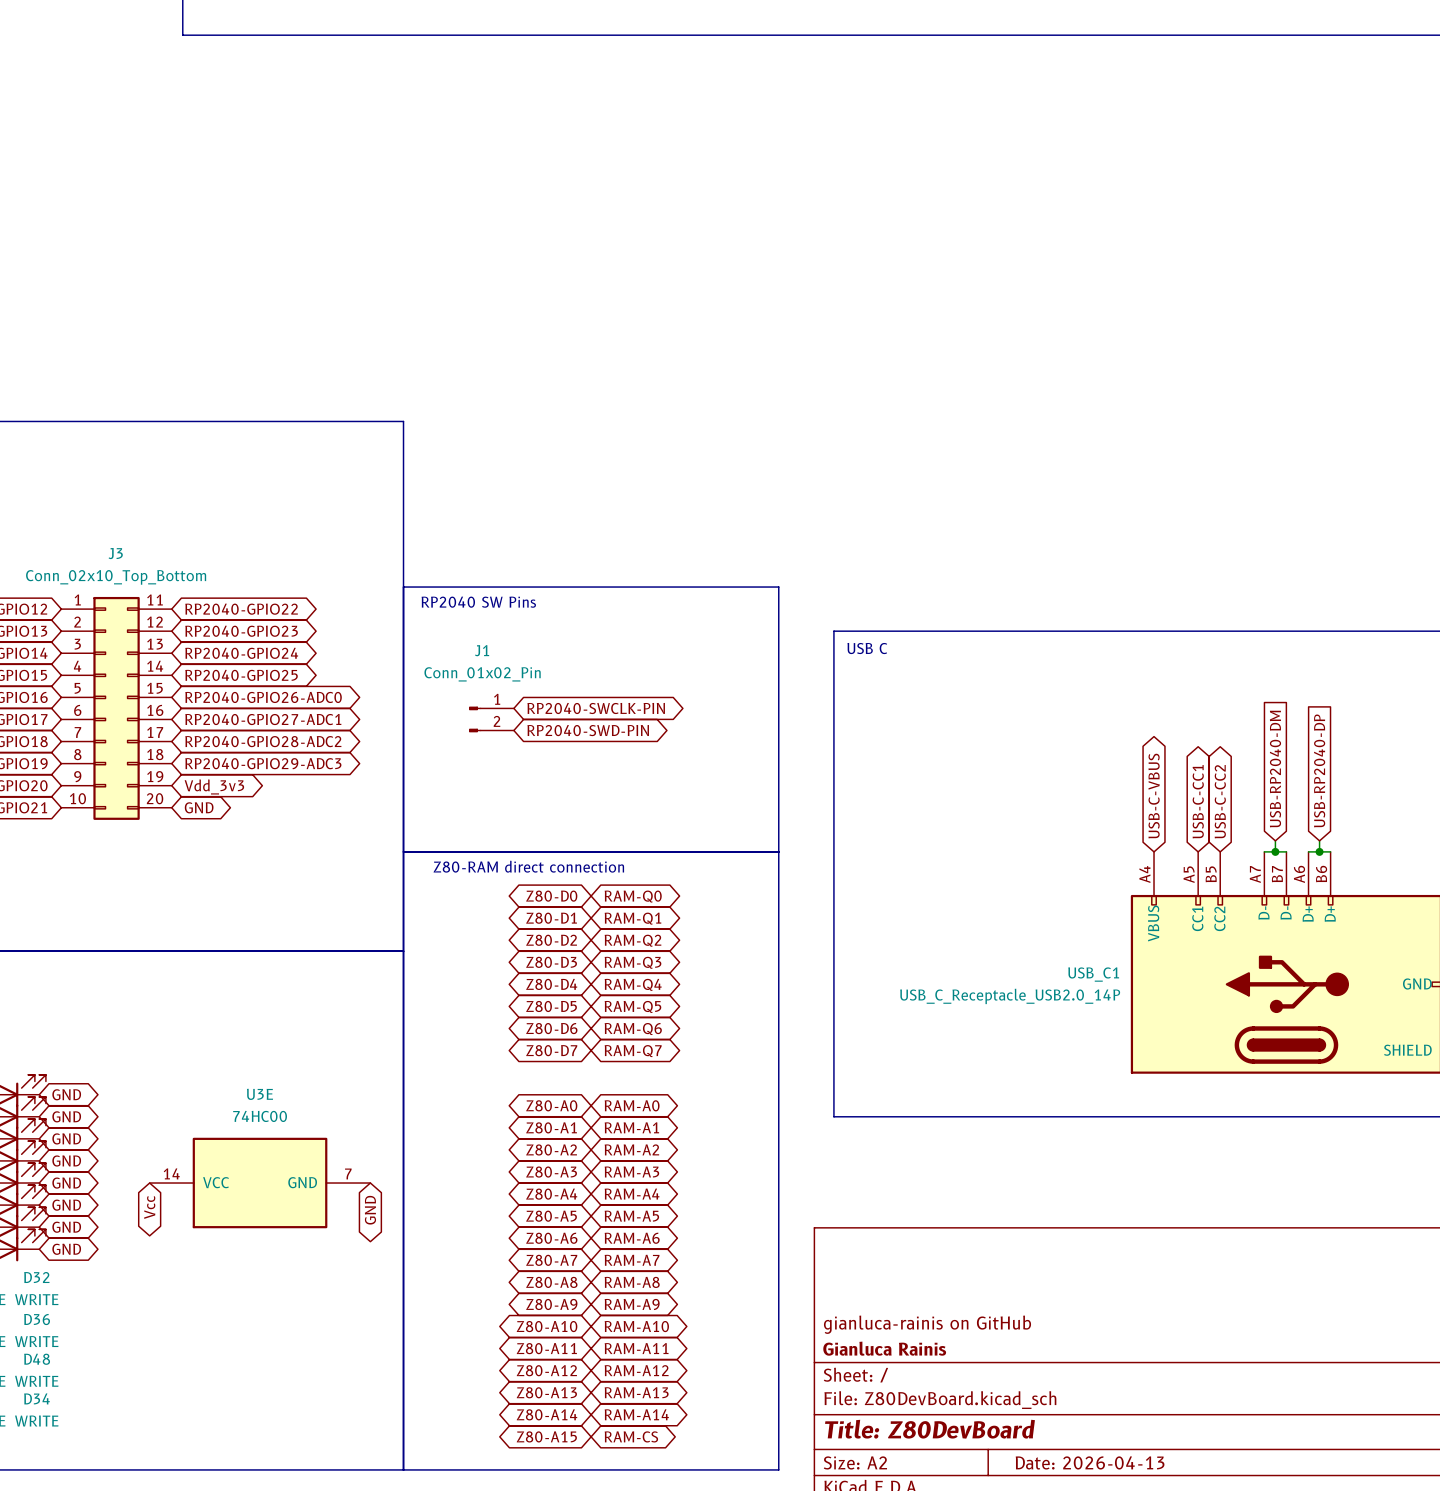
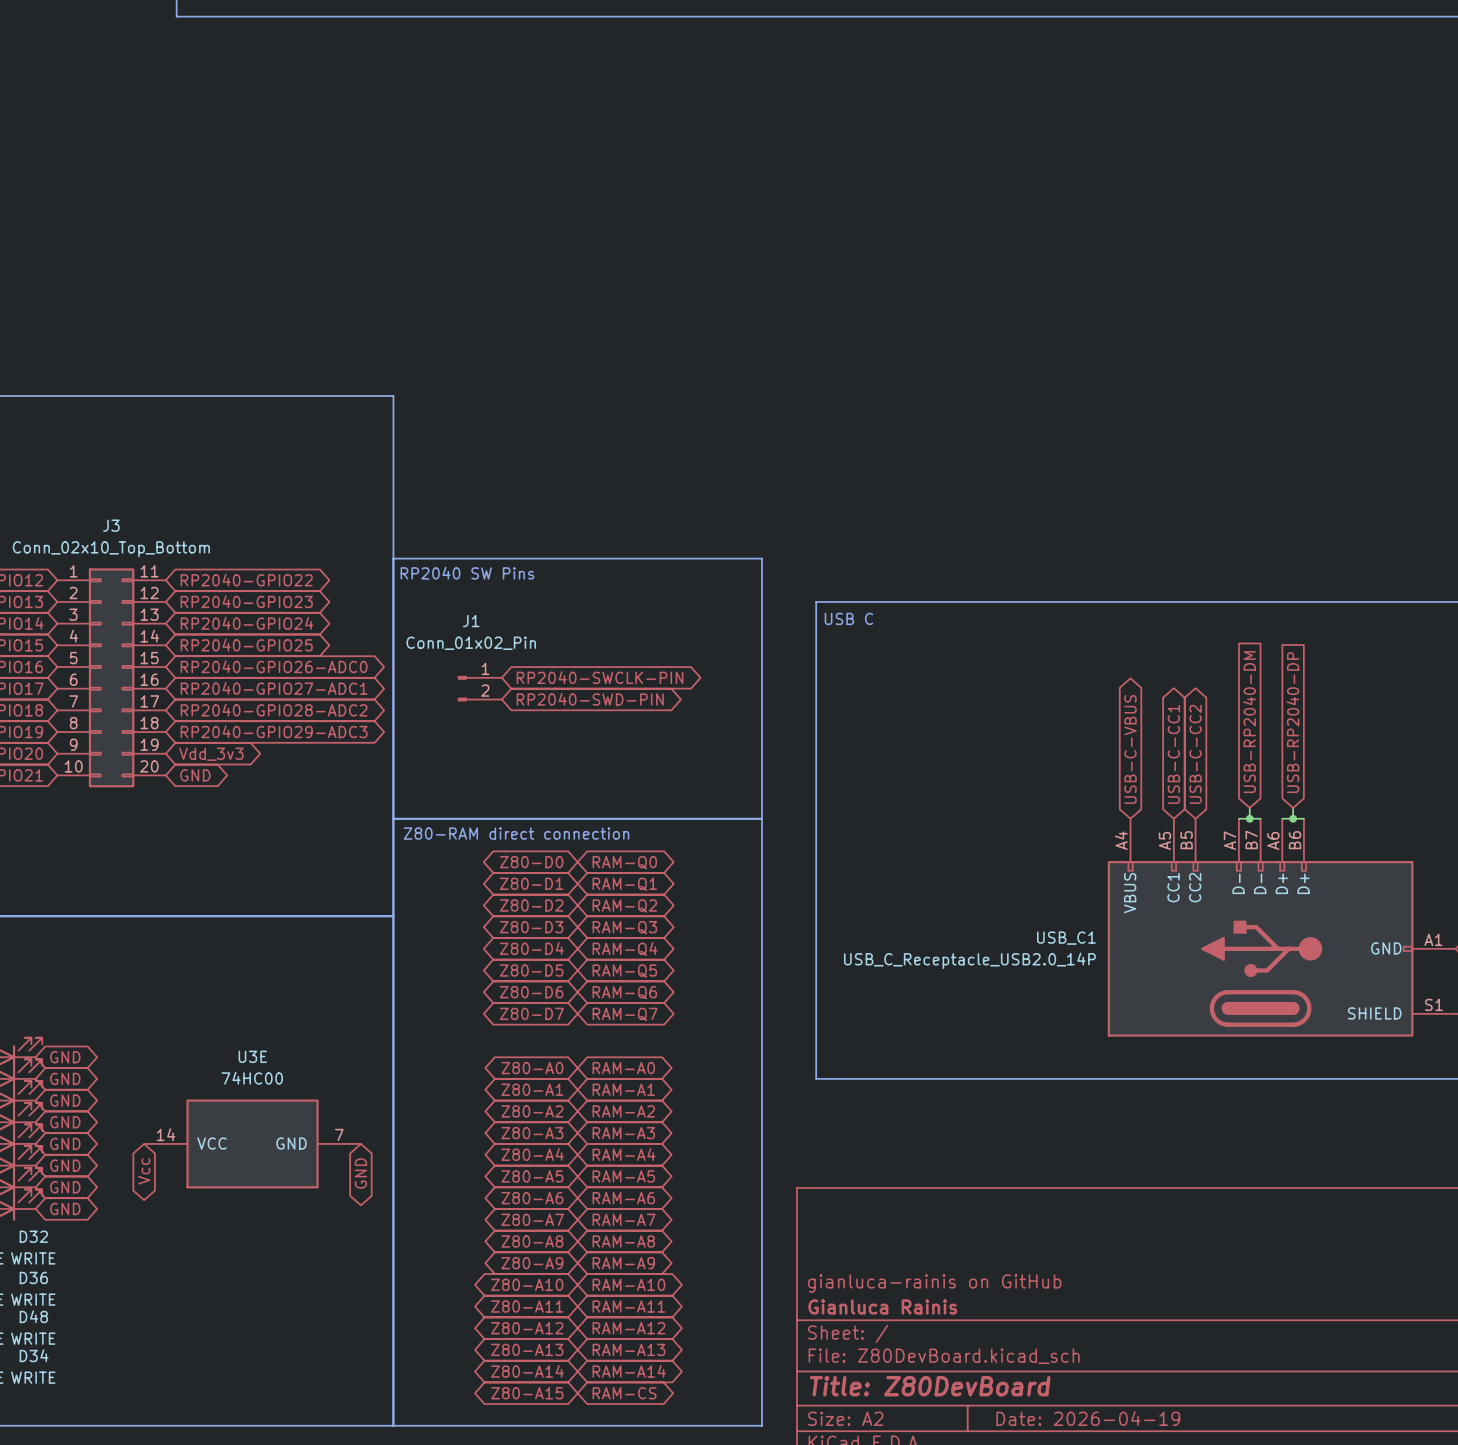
title block: Date: 2026-04-13 (1090, 1462) -> Date: 2026-04-19 (1088, 1418)

